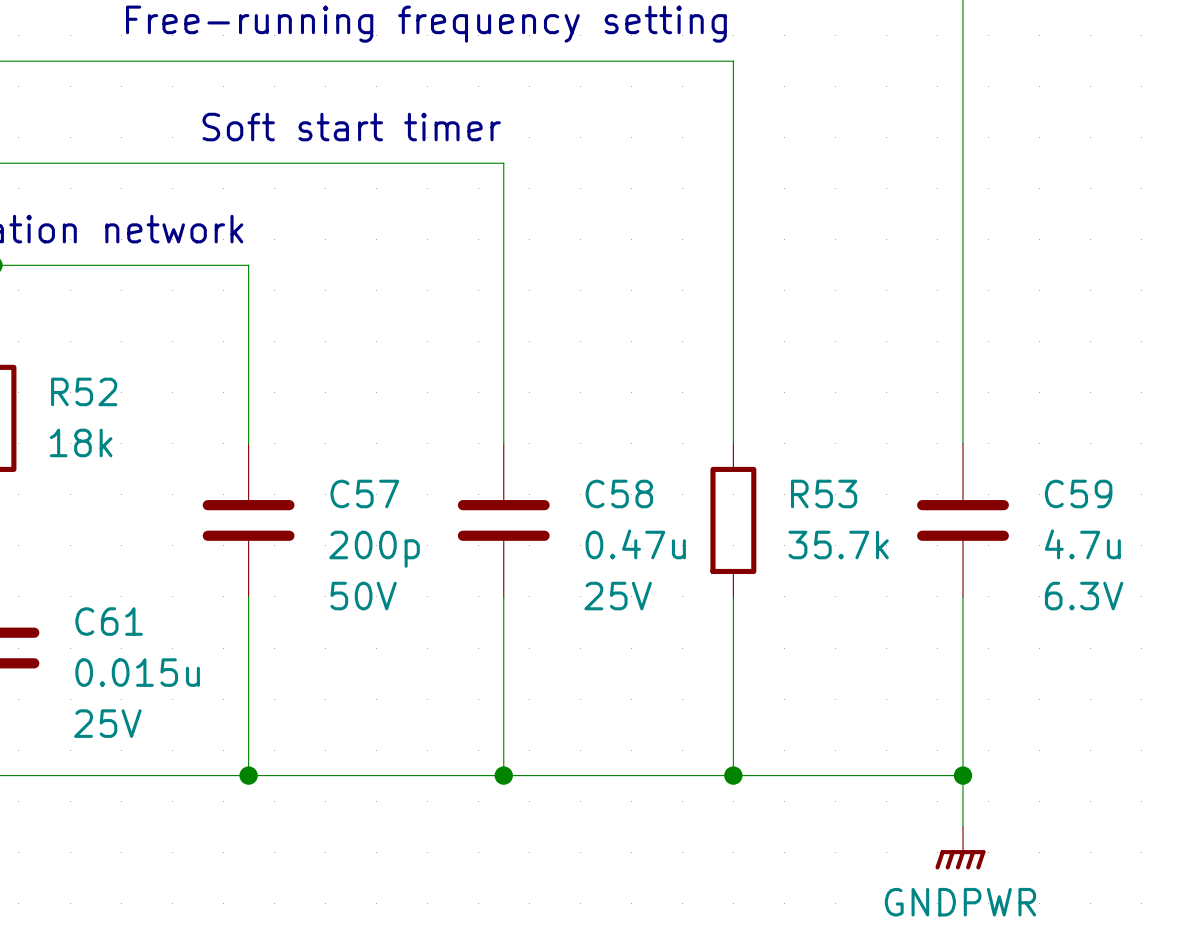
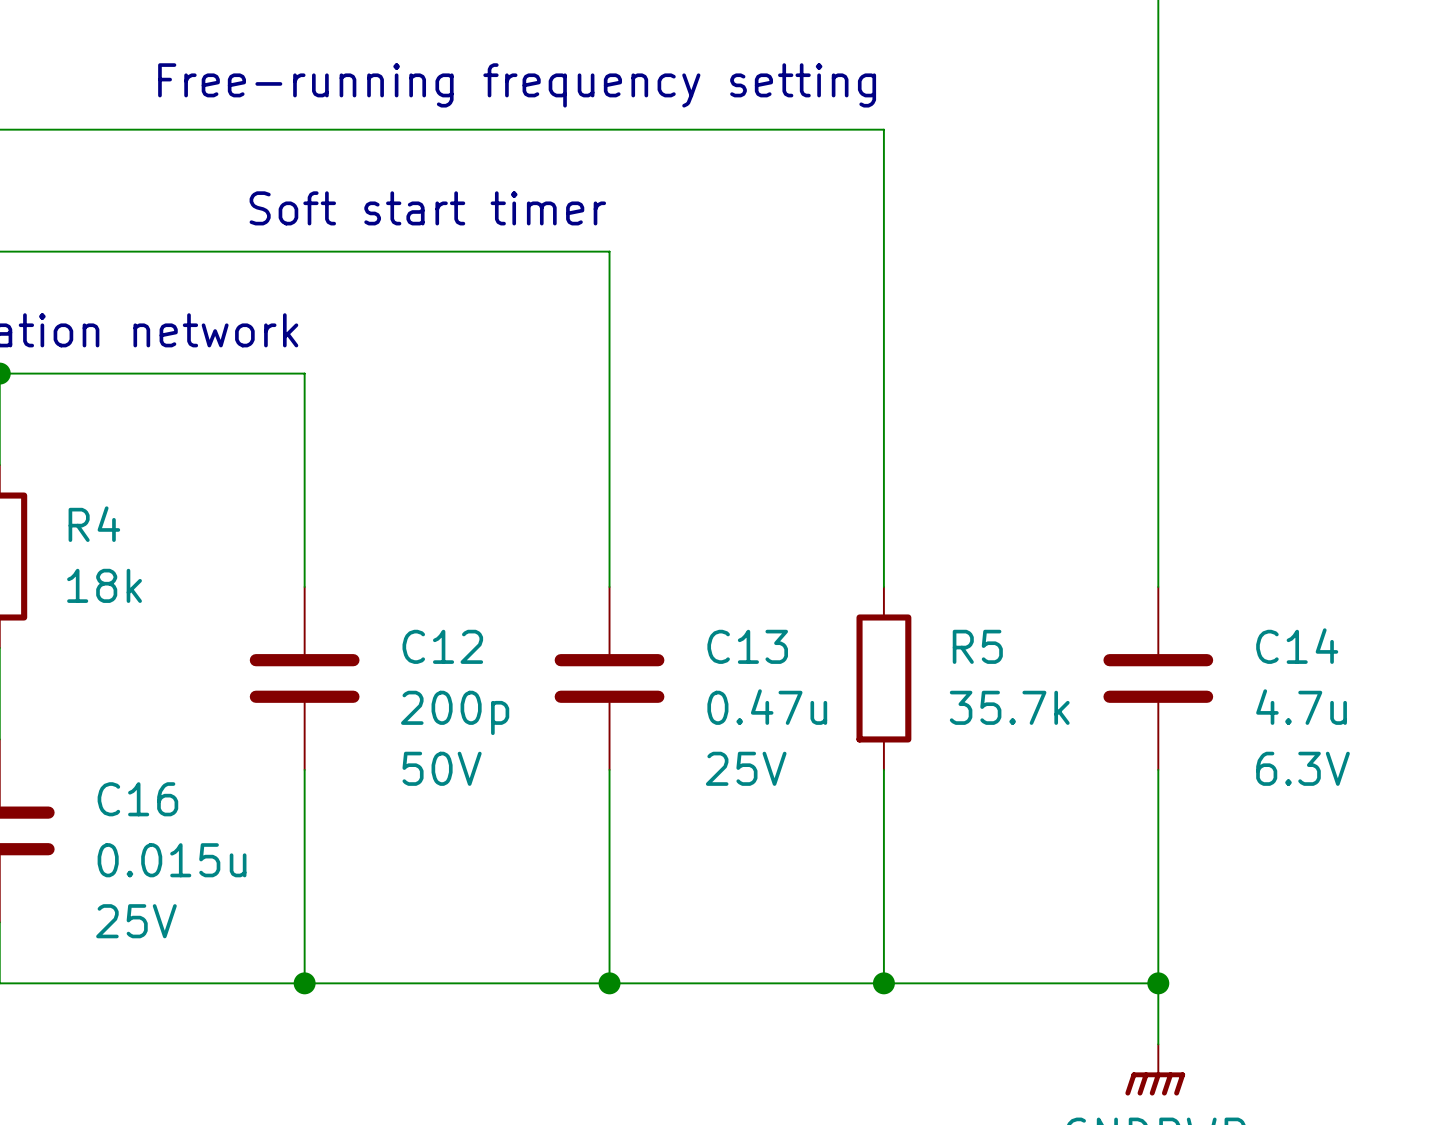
R52 name: R52 (84, 391) -> R4 (94, 524)
C57 name: C57 (364, 493) -> C12 (442, 646)
C58 name: C58 (619, 493) -> C13 (747, 646)
R53 name: R53 (824, 493) -> R5 (977, 646)
C59 name: C59 (1078, 493) -> C14 (1297, 646)
C61 name: C61 (109, 621) -> C16 (137, 799)

